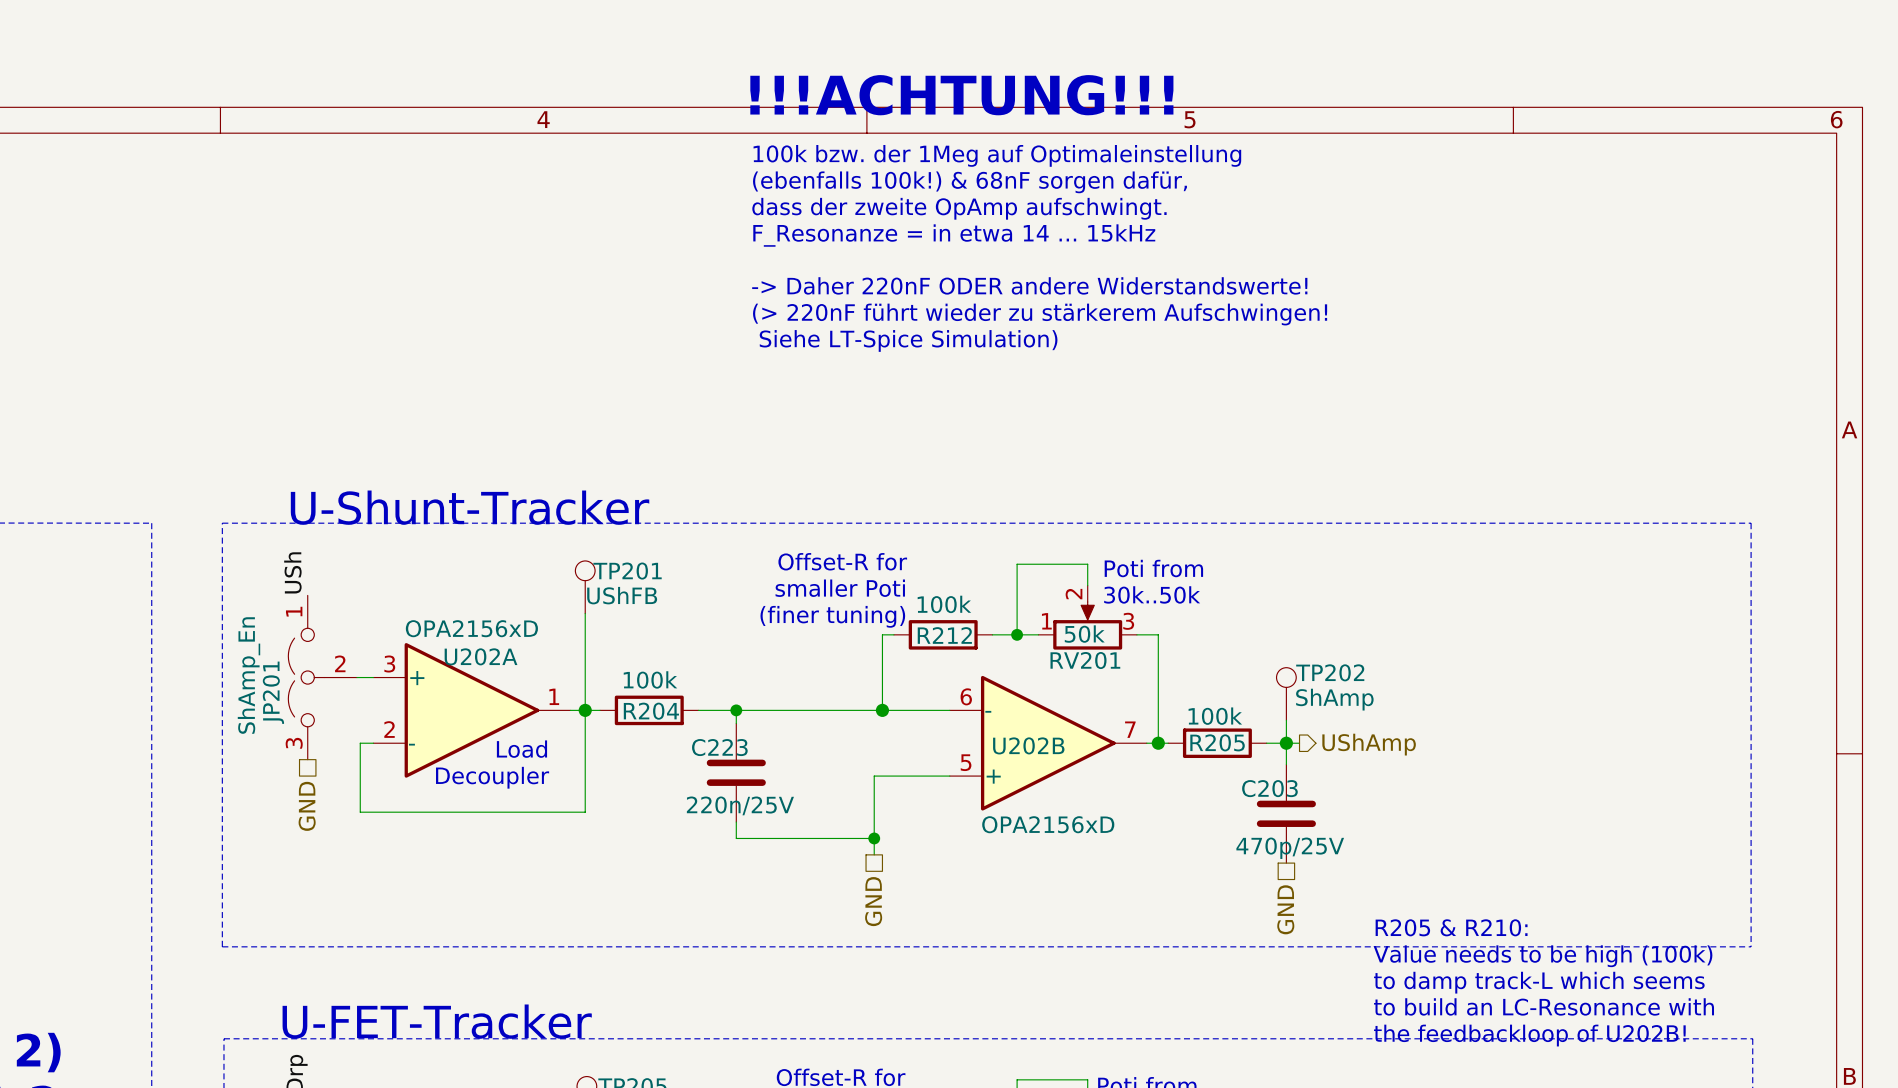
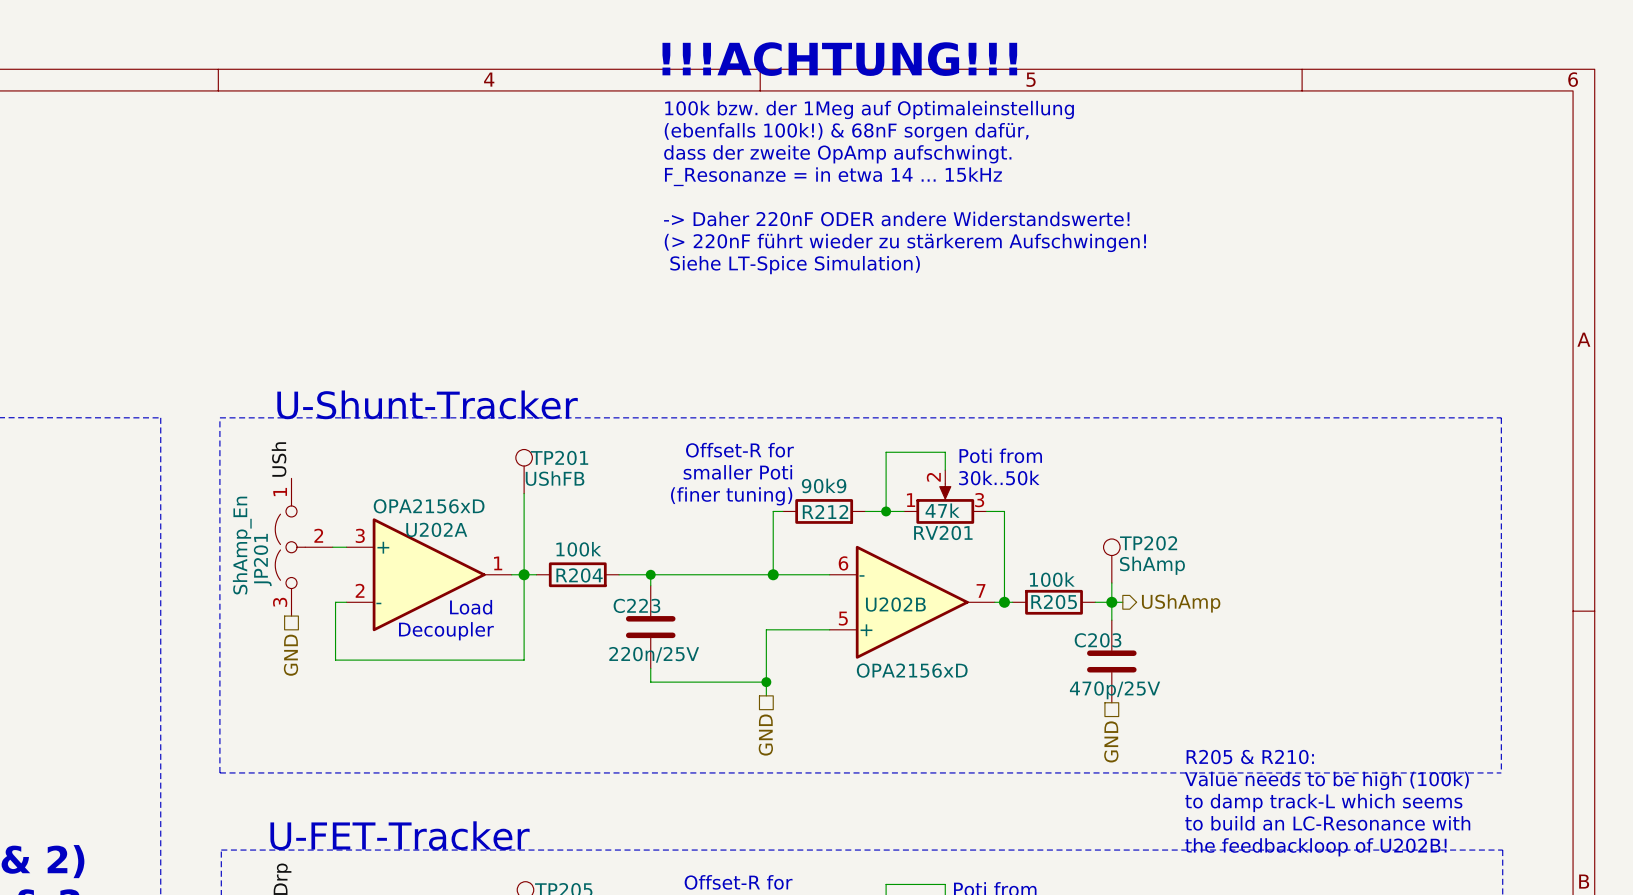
R212 value: 100k (944, 604) -> 90k9 (824, 485)
RV201 value: 50k (1084, 634) -> 47k (942, 510)

